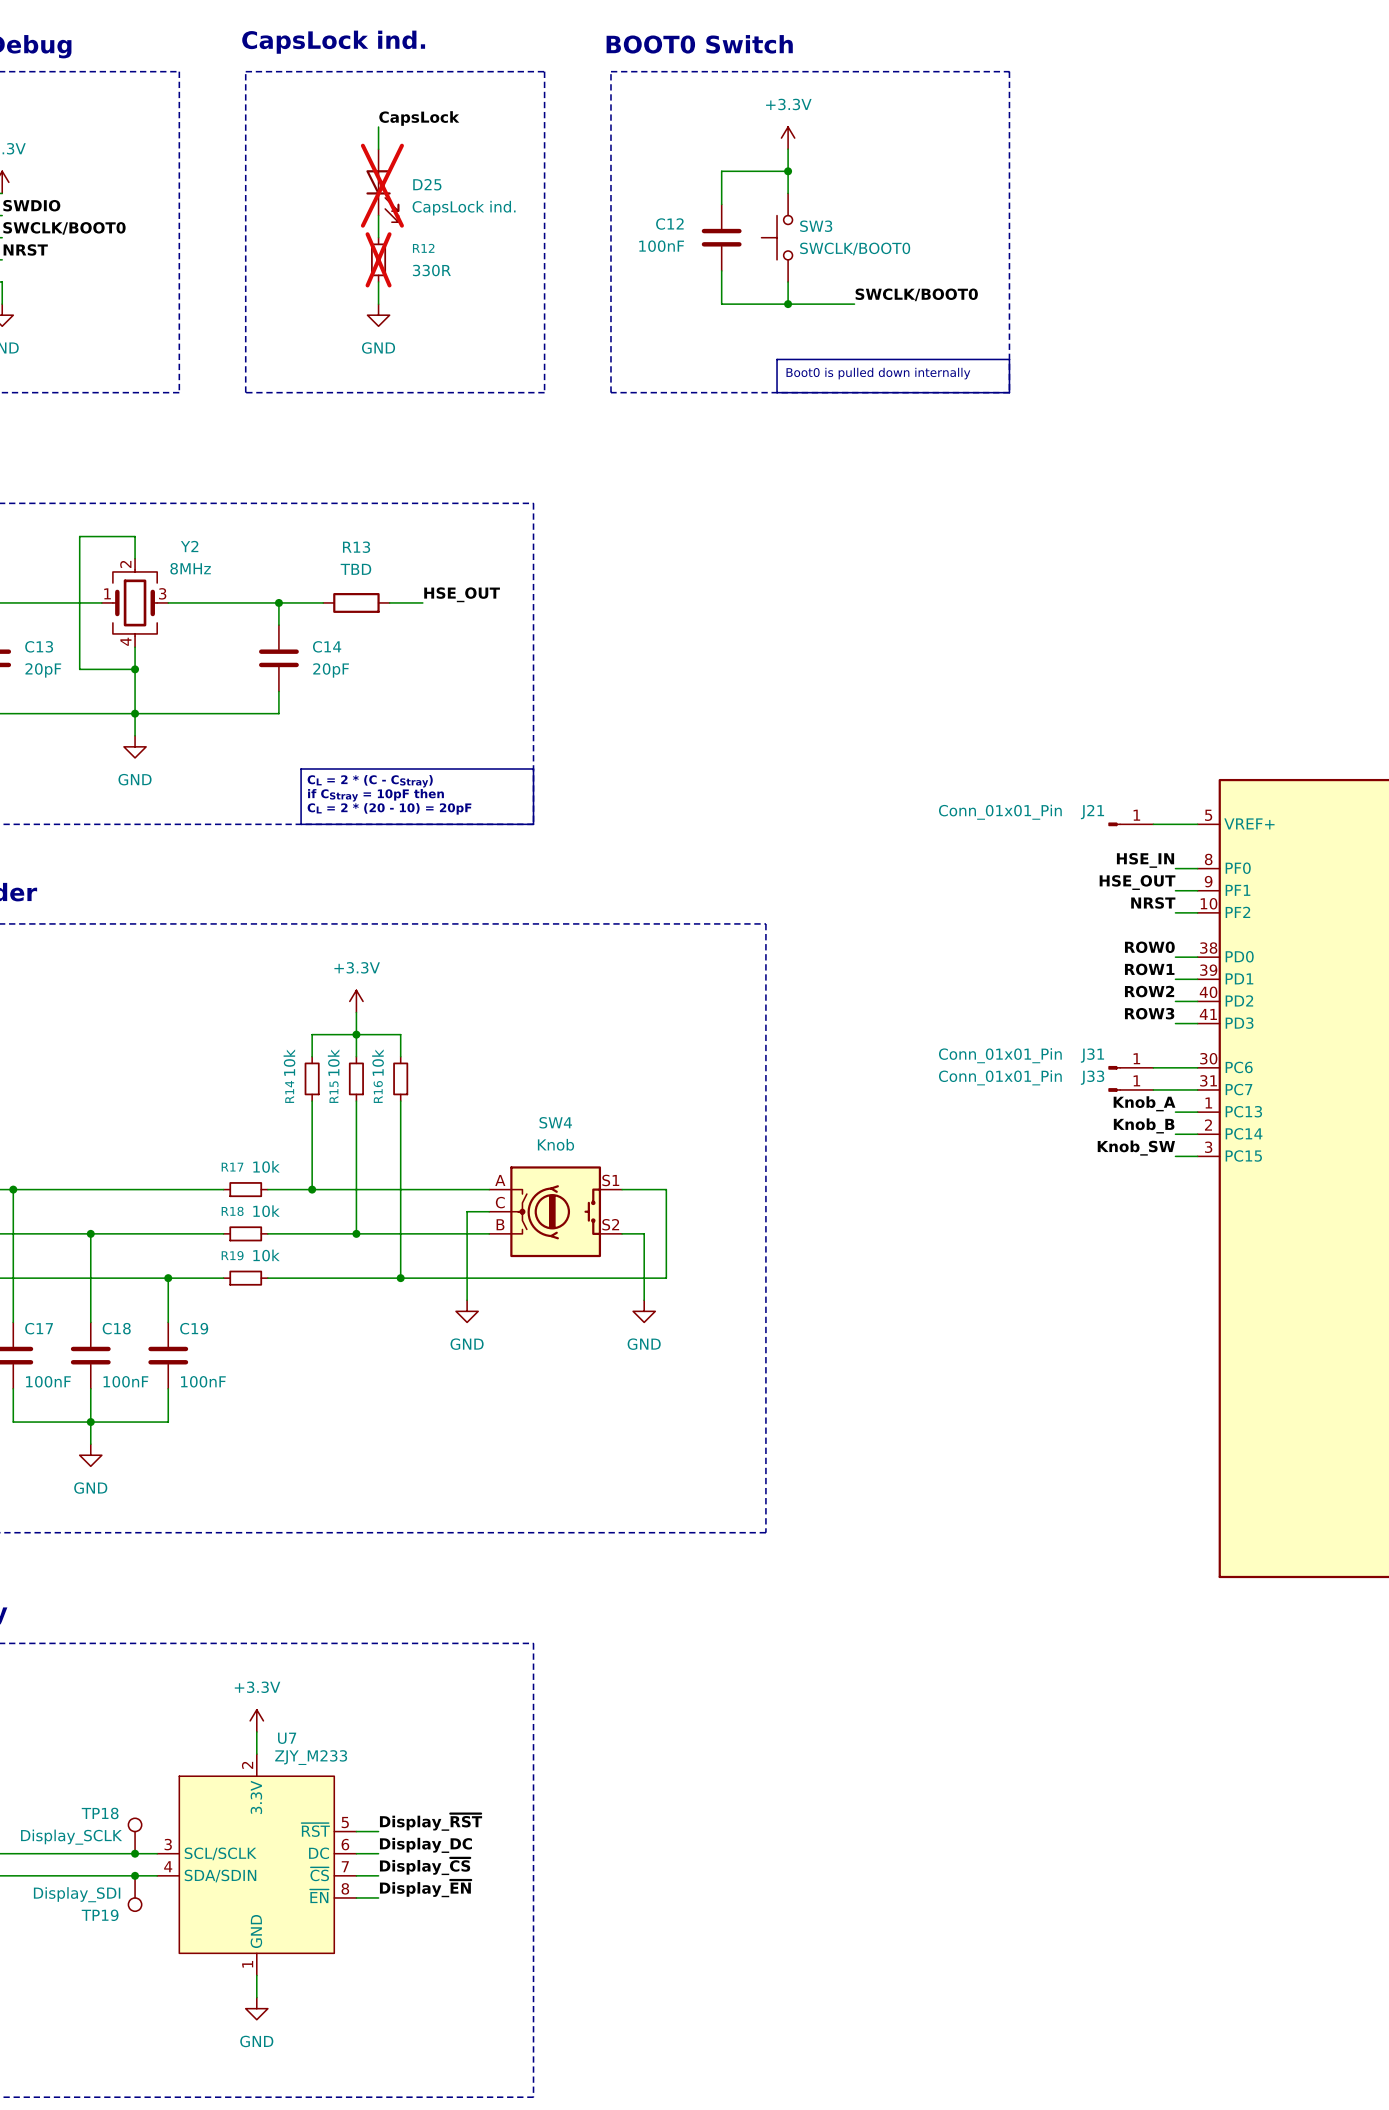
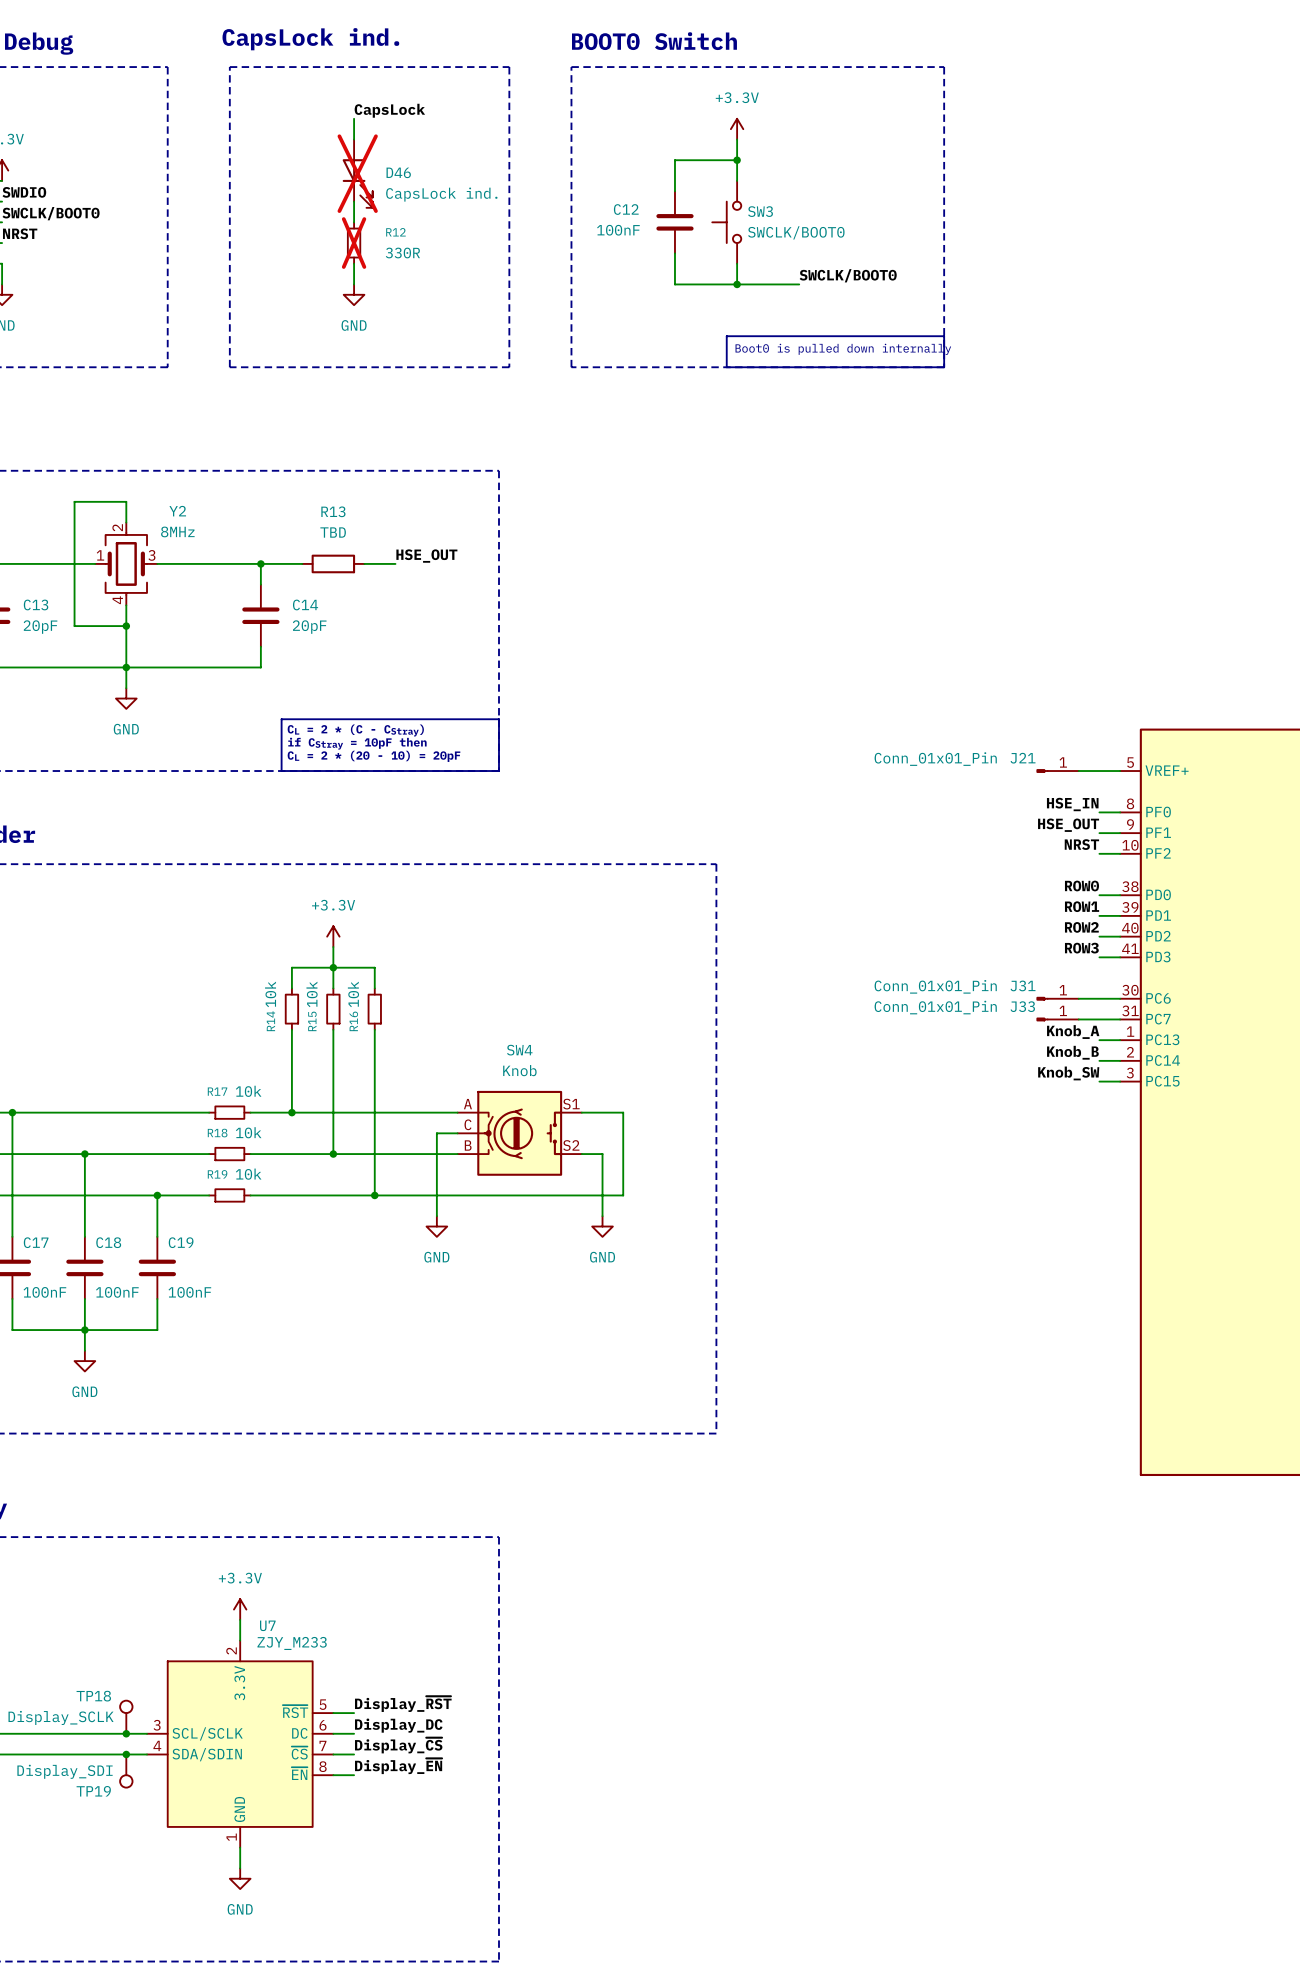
D25 name: D25 (427, 184) -> D46 (398, 172)

